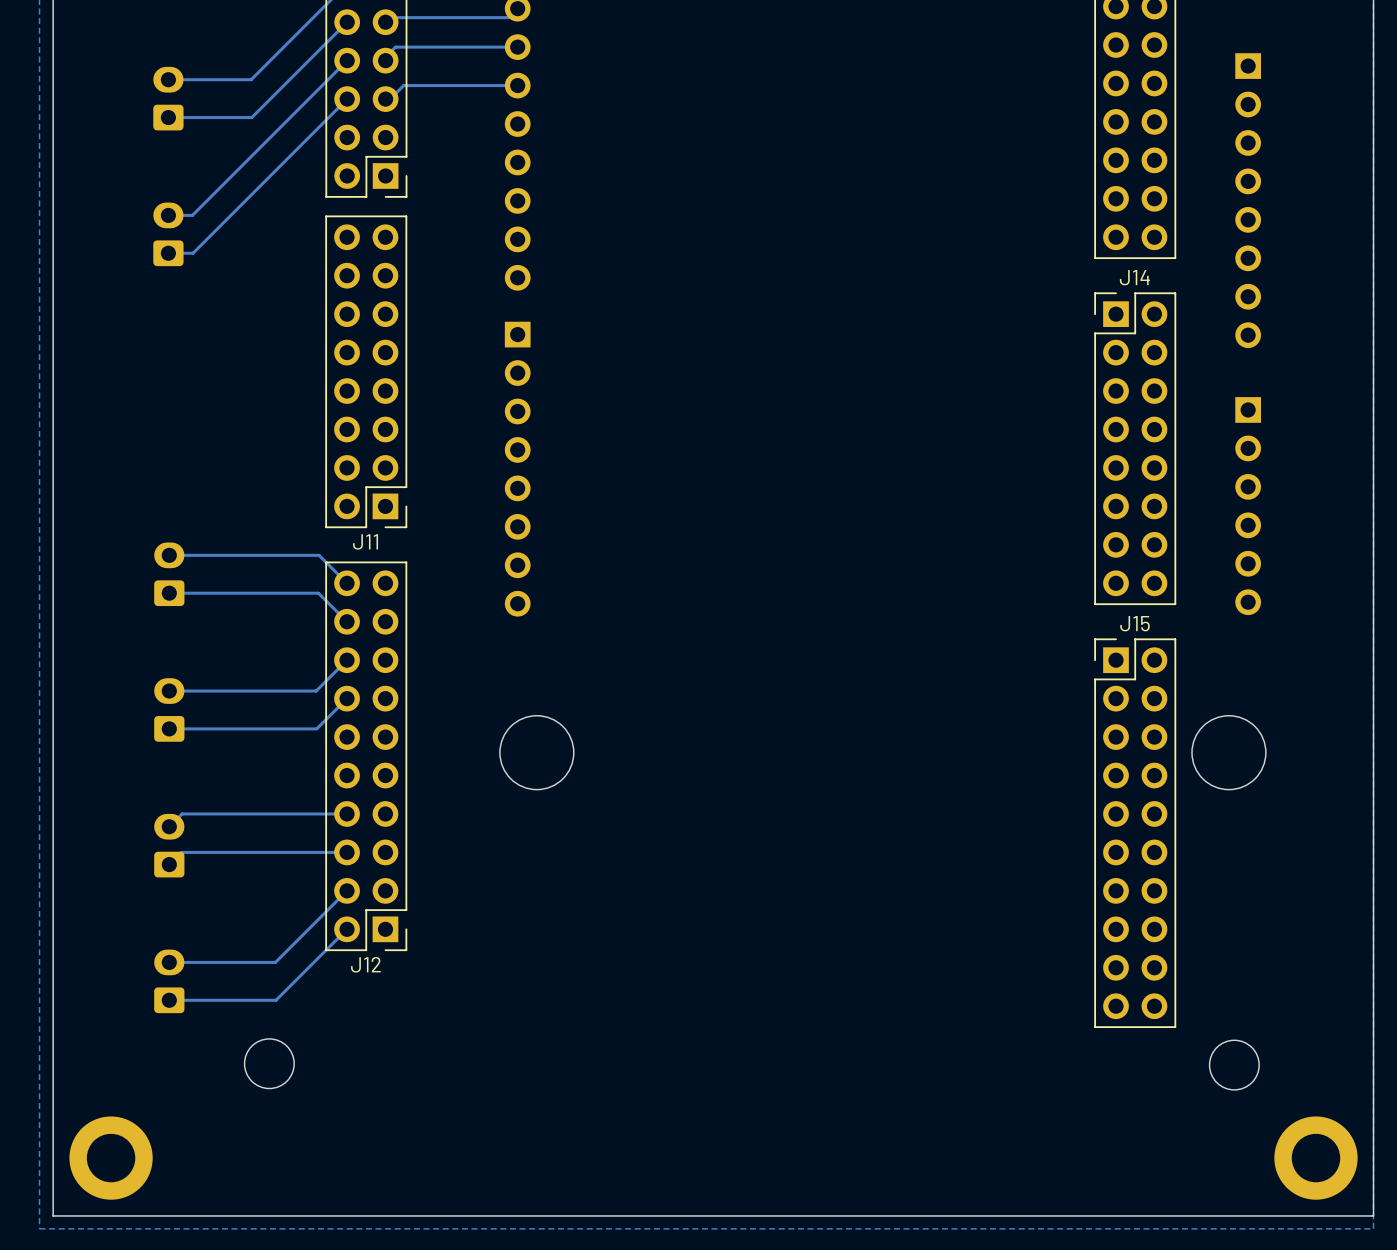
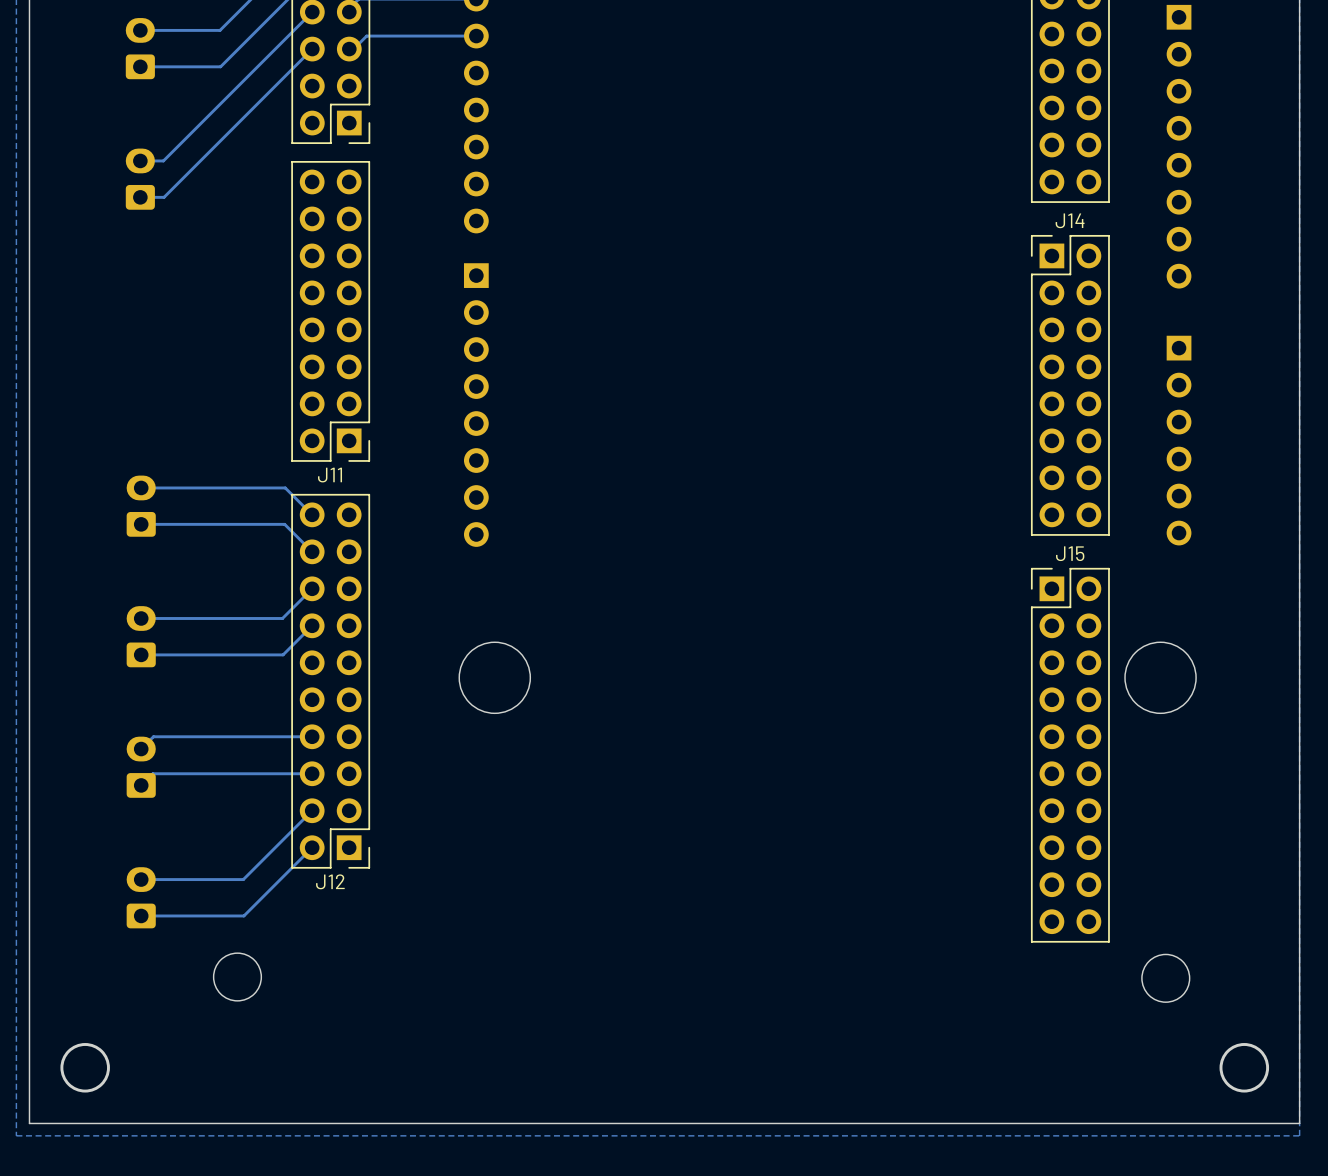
round board edge: none -> [60, 1043, 110, 1093]
round board edge: none -> [1219, 1043, 1270, 1093]
part: (111, 1158) -> none
part: (1315, 1158) -> none

